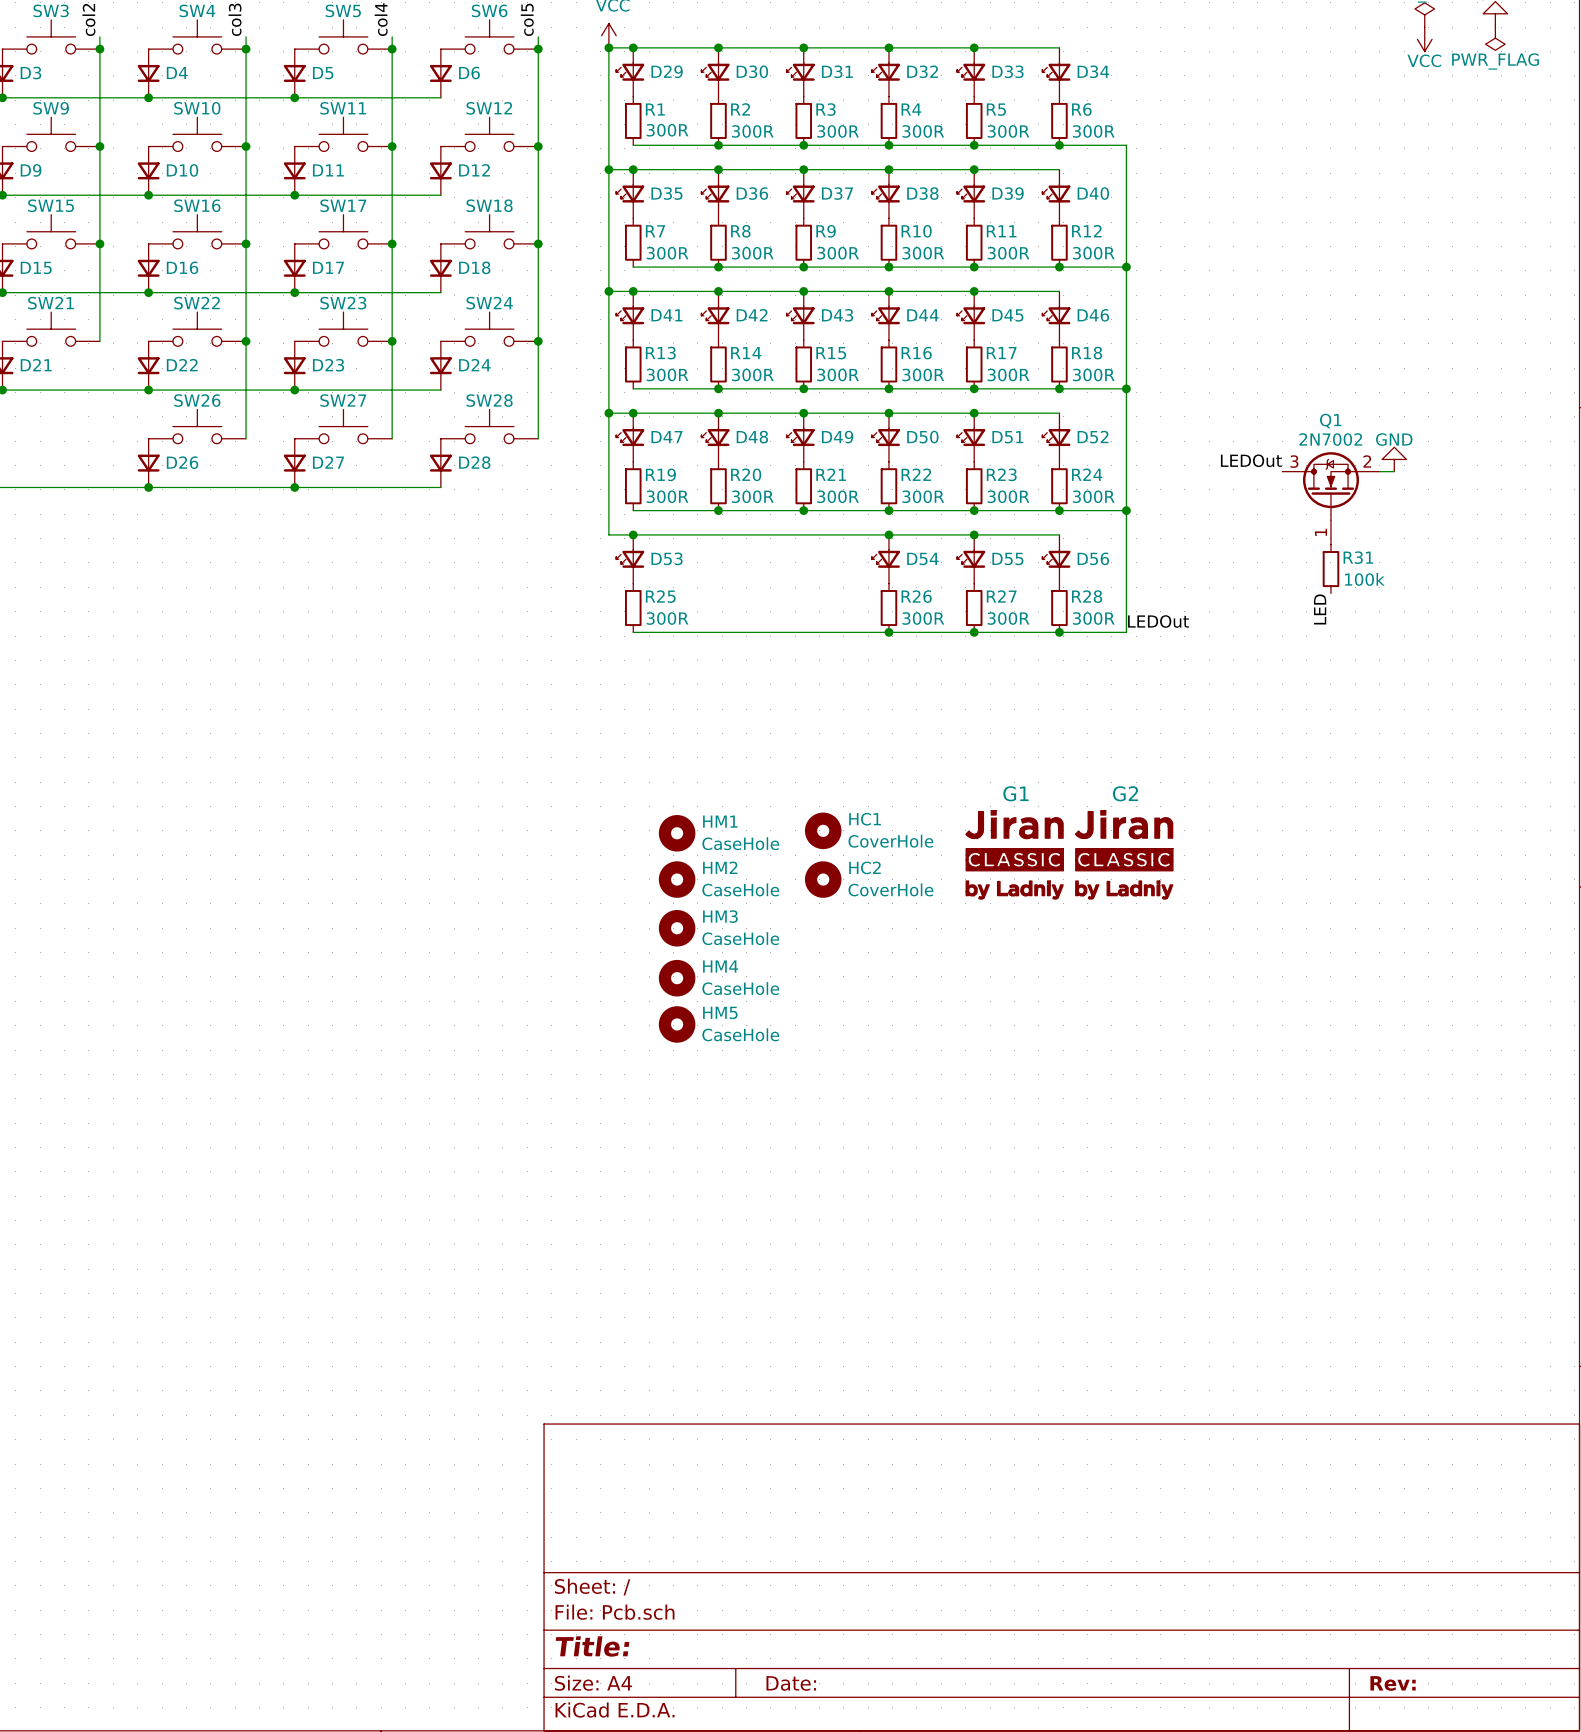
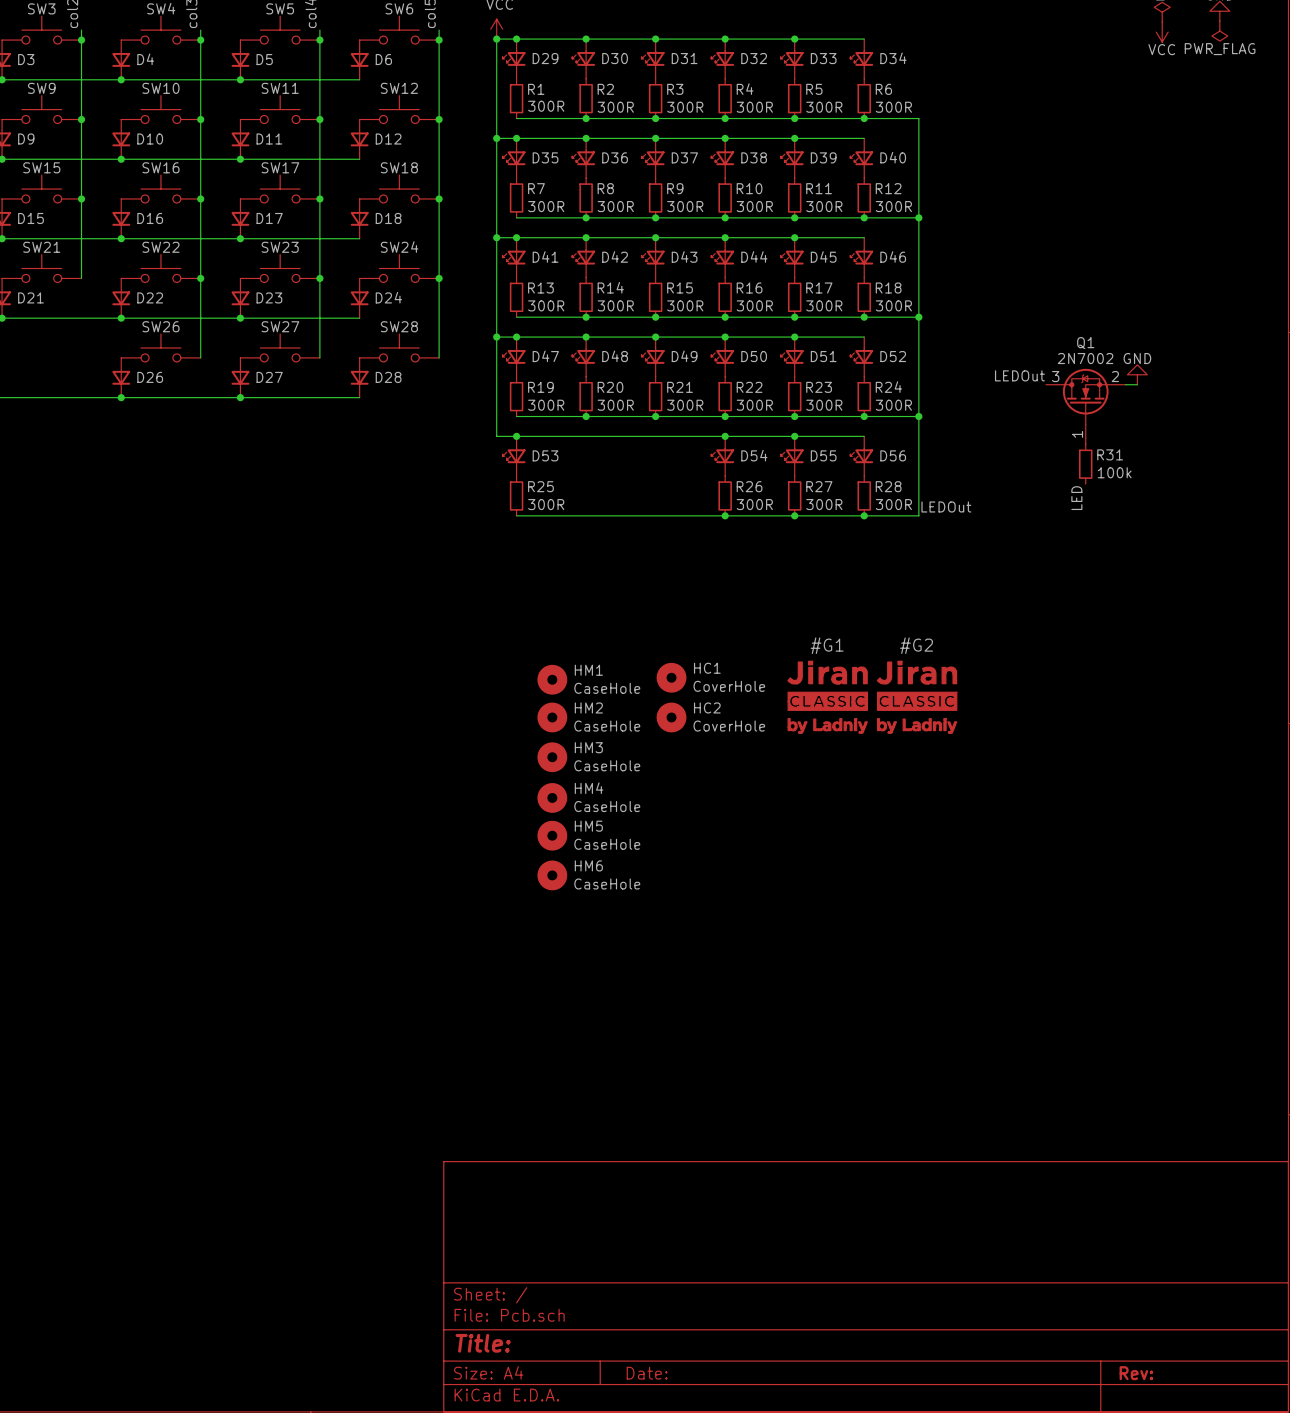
G1: (1014, 854) -> none
#G1: none -> (827, 697)
G2: (1124, 854) -> none
#G2: none -> (917, 697)
HM6: none -> CaseHole (552, 875)

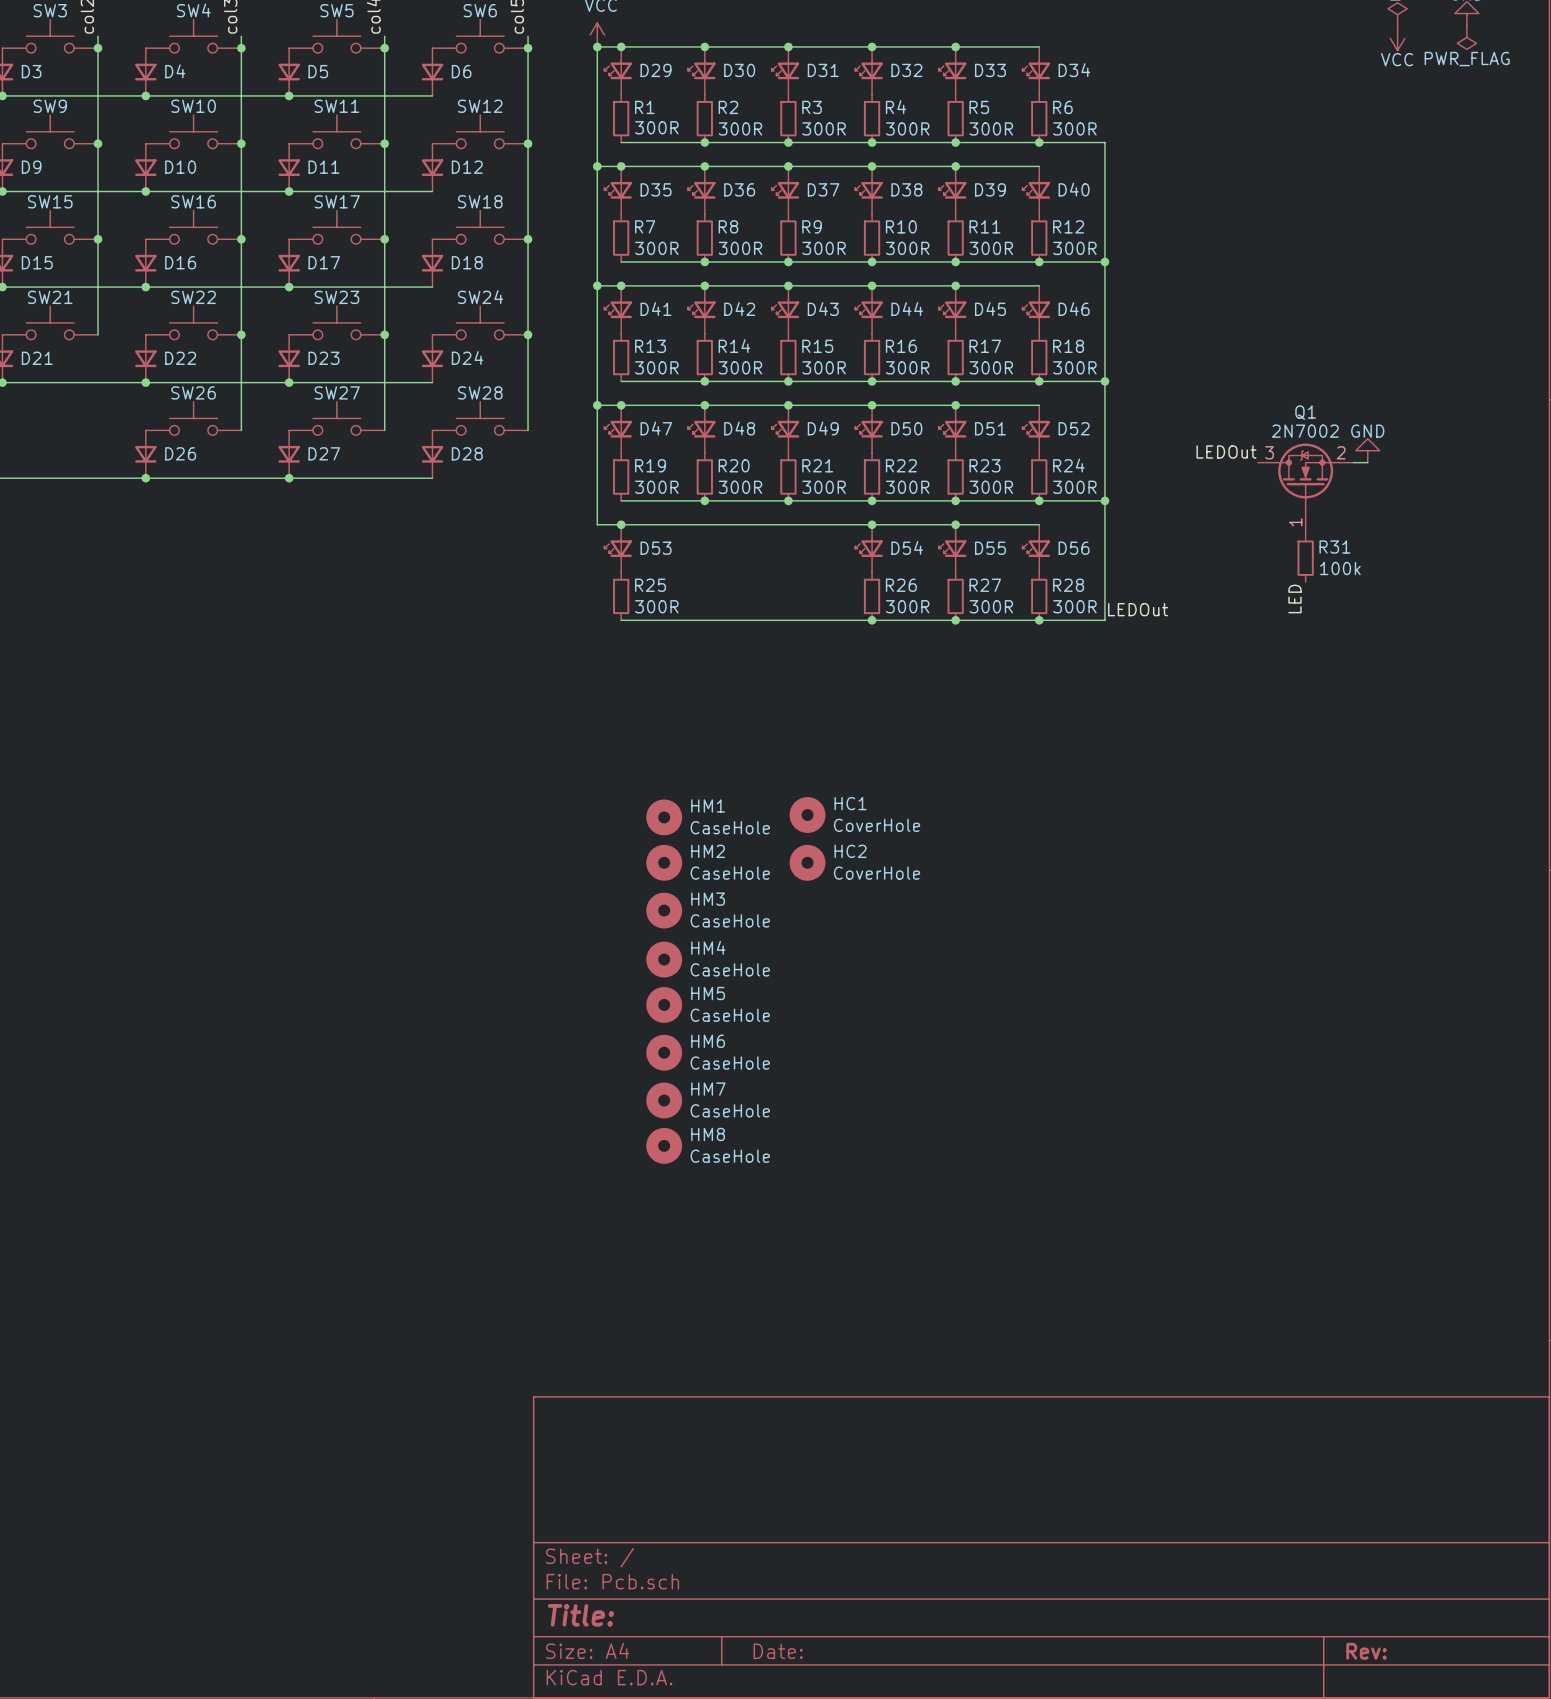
#G1: (827, 697) -> none
#G2: (917, 697) -> none
HM7: none -> CaseHole (664, 1100)
HM8: none -> CaseHole (664, 1145)

